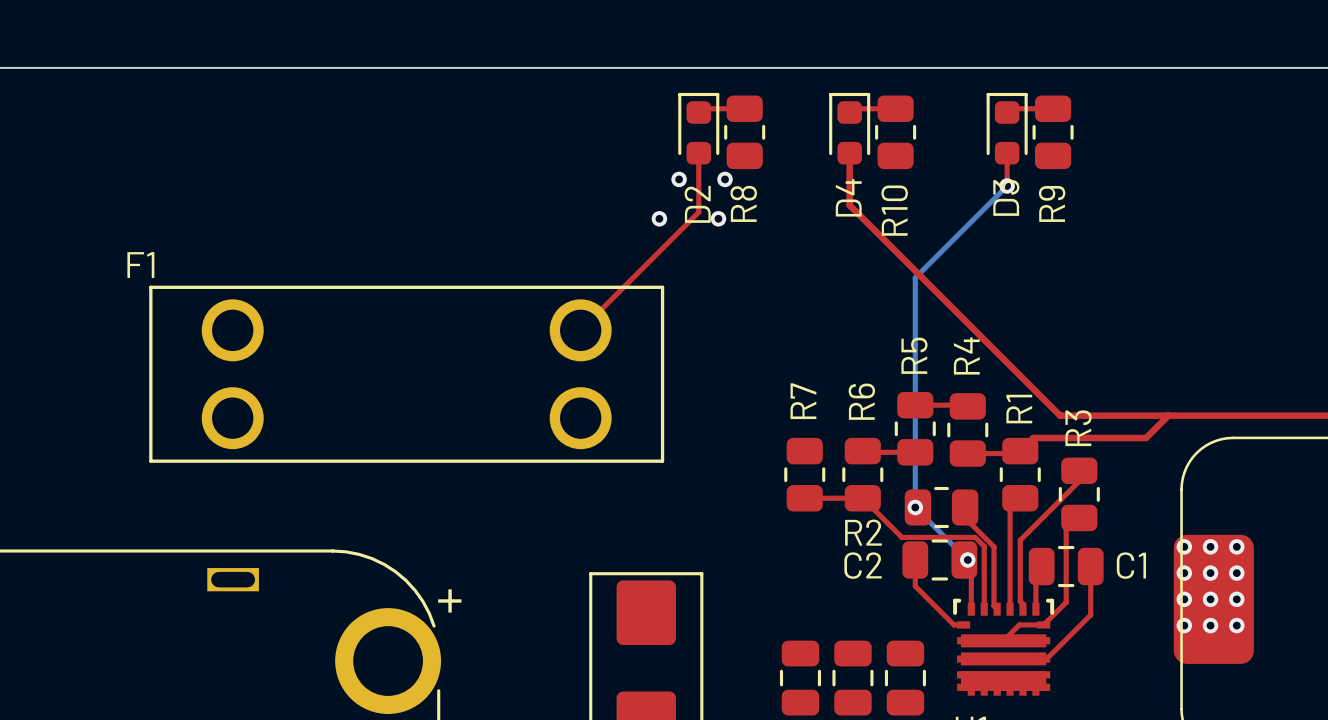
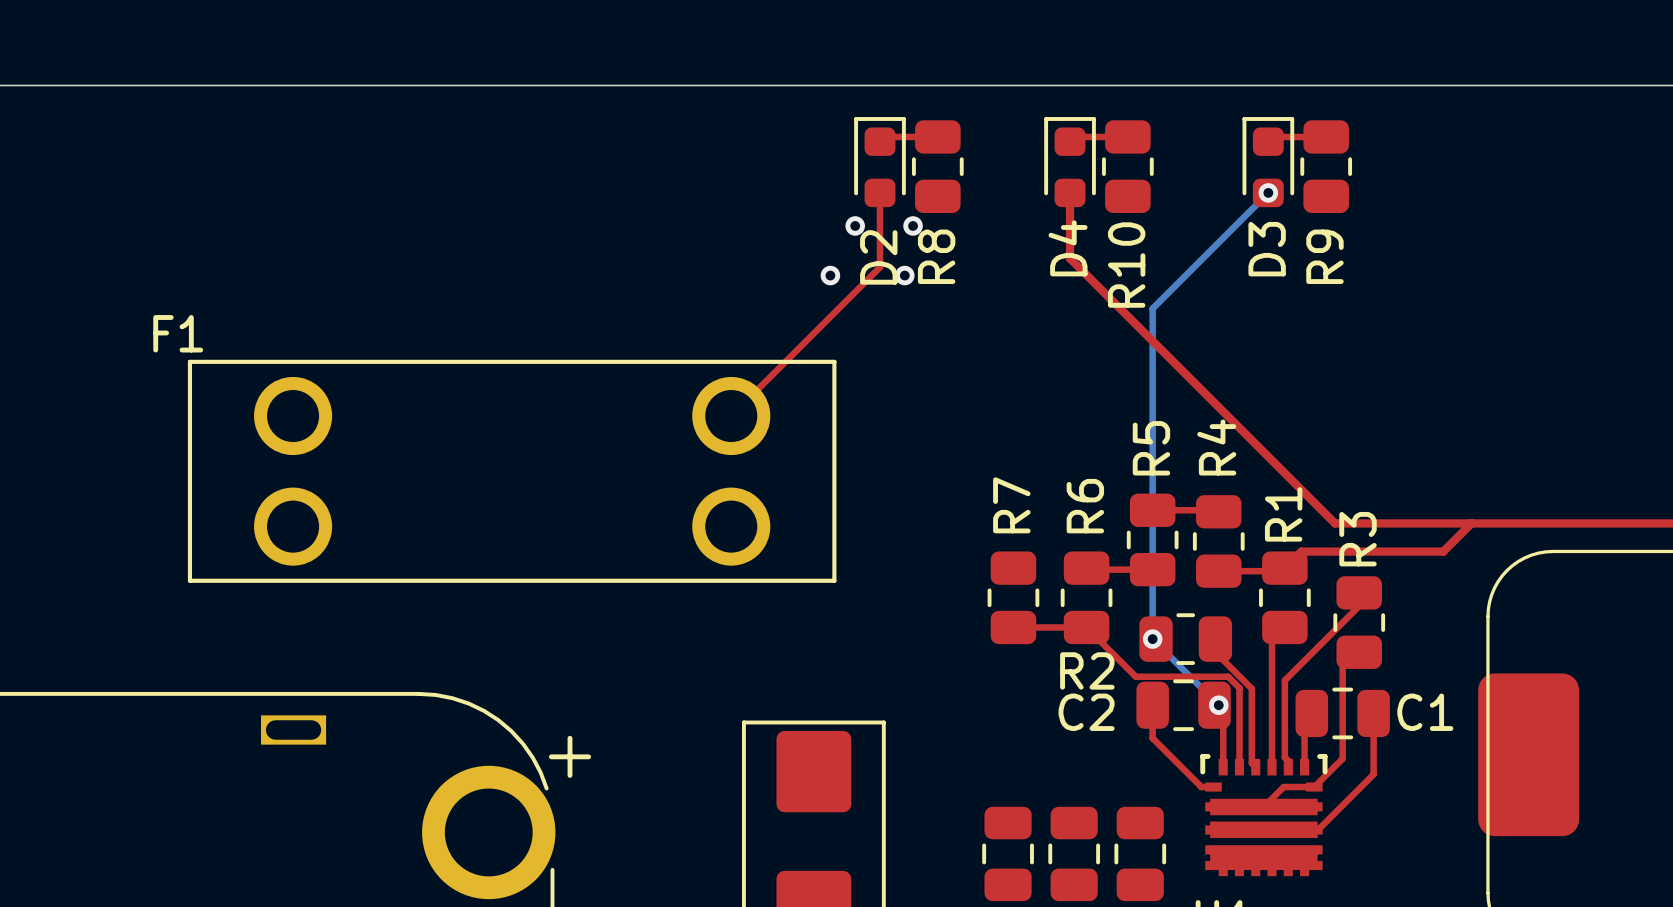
top track: (1007, 153) (1007, 185) -> none
bottom track: (1007, 185) (915, 277) -> (1268, 192) (1152, 308) (1152, 349)
via position: (1007, 185) -> (1268, 192)
via: (1184, 546) -> none
via: (1210, 546) -> none
via: (1236, 546) -> none
via: (1184, 573) -> none
via: (1210, 573) -> none
via: (1236, 573) -> none
via: (1184, 599) -> none
via: (1210, 599) -> none
via: (1236, 599) -> none
via: (1184, 625) -> none
via: (1210, 625) -> none
via: (1236, 625) -> none

